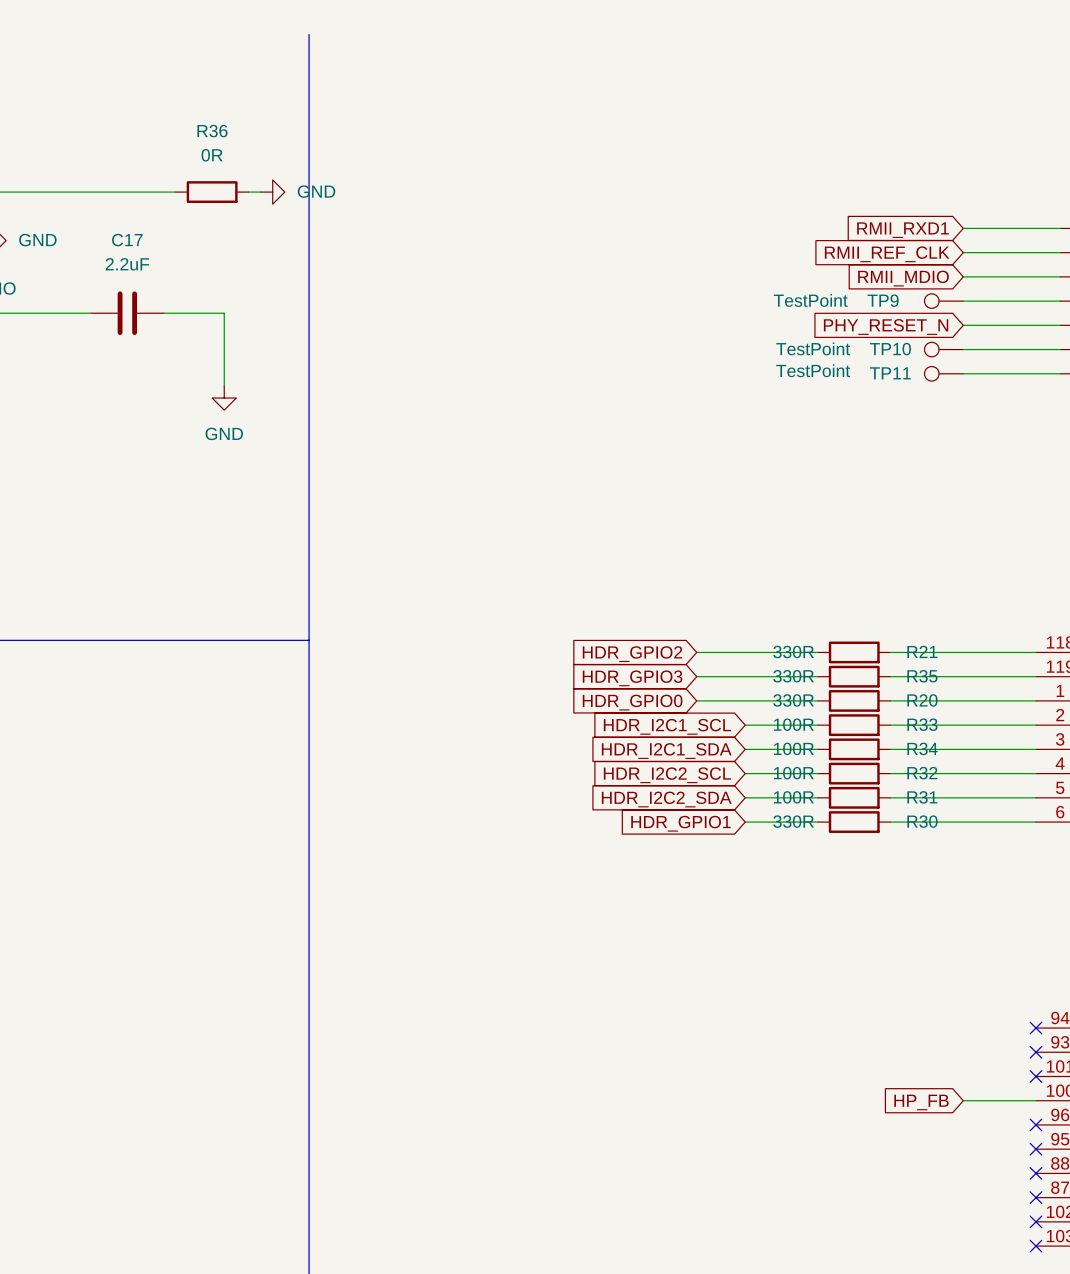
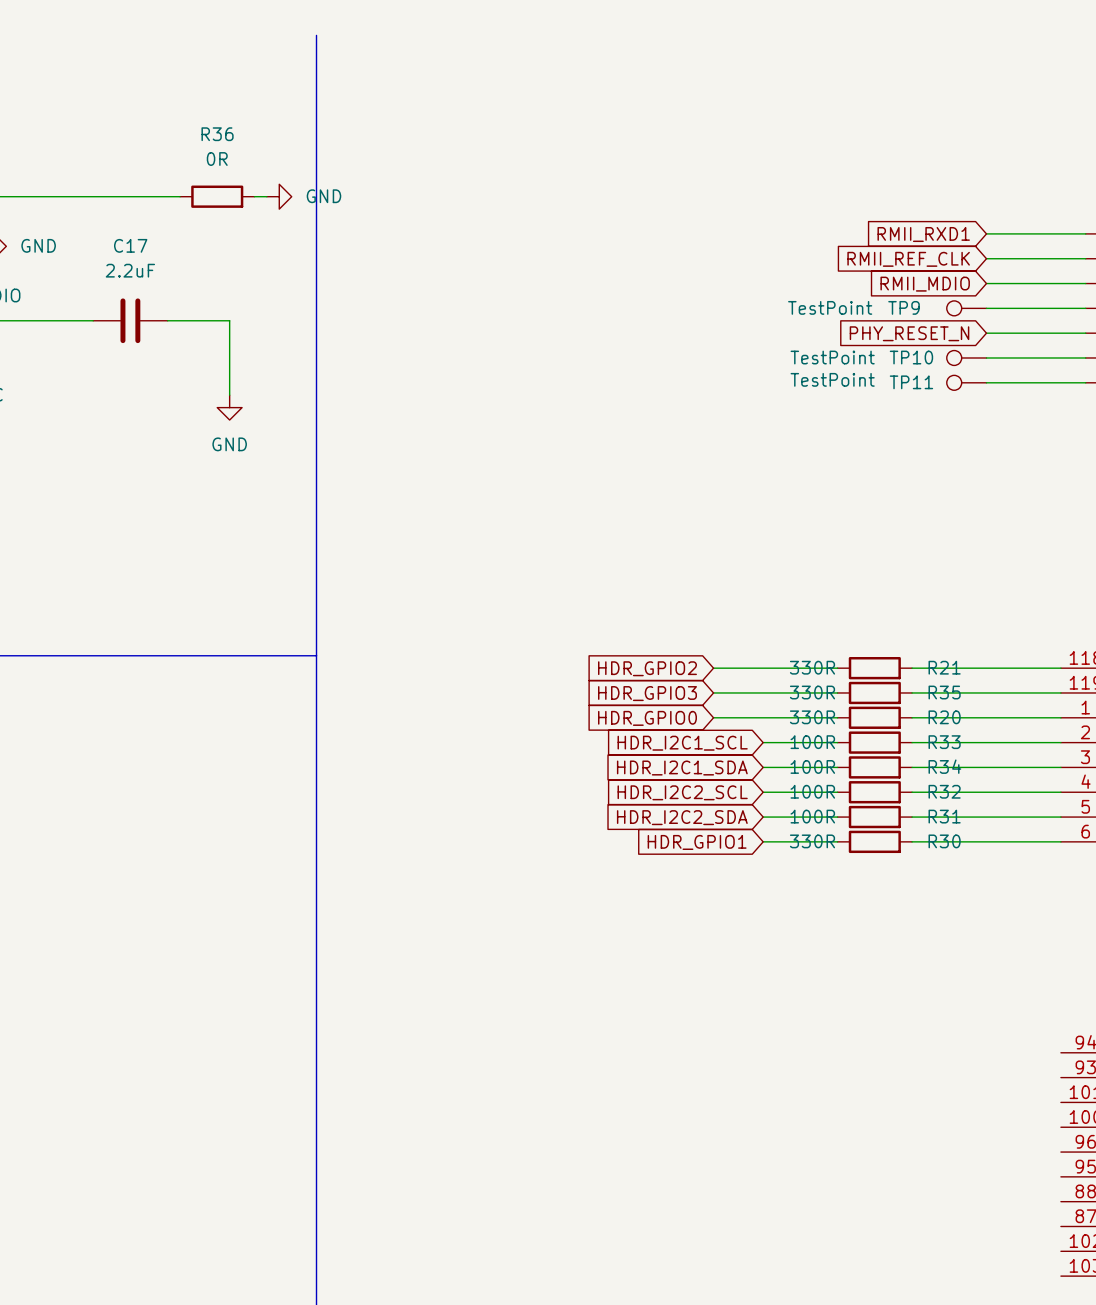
no-connect mark: (1035, 1028) -> none
no-connect mark: (1035, 1052) -> none
no-connect mark: (1035, 1076) -> none
wire: (963, 1100) (1035, 1100) -> none
global label: HP_FB (921, 1102) -> none
no-connect mark: (1035, 1124) -> none
no-connect mark: (1035, 1149) -> none
no-connect mark: (1035, 1173) -> none
no-connect mark: (1035, 1197) -> none
no-connect mark: (1035, 1221) -> none
no-connect mark: (1035, 1246) -> none

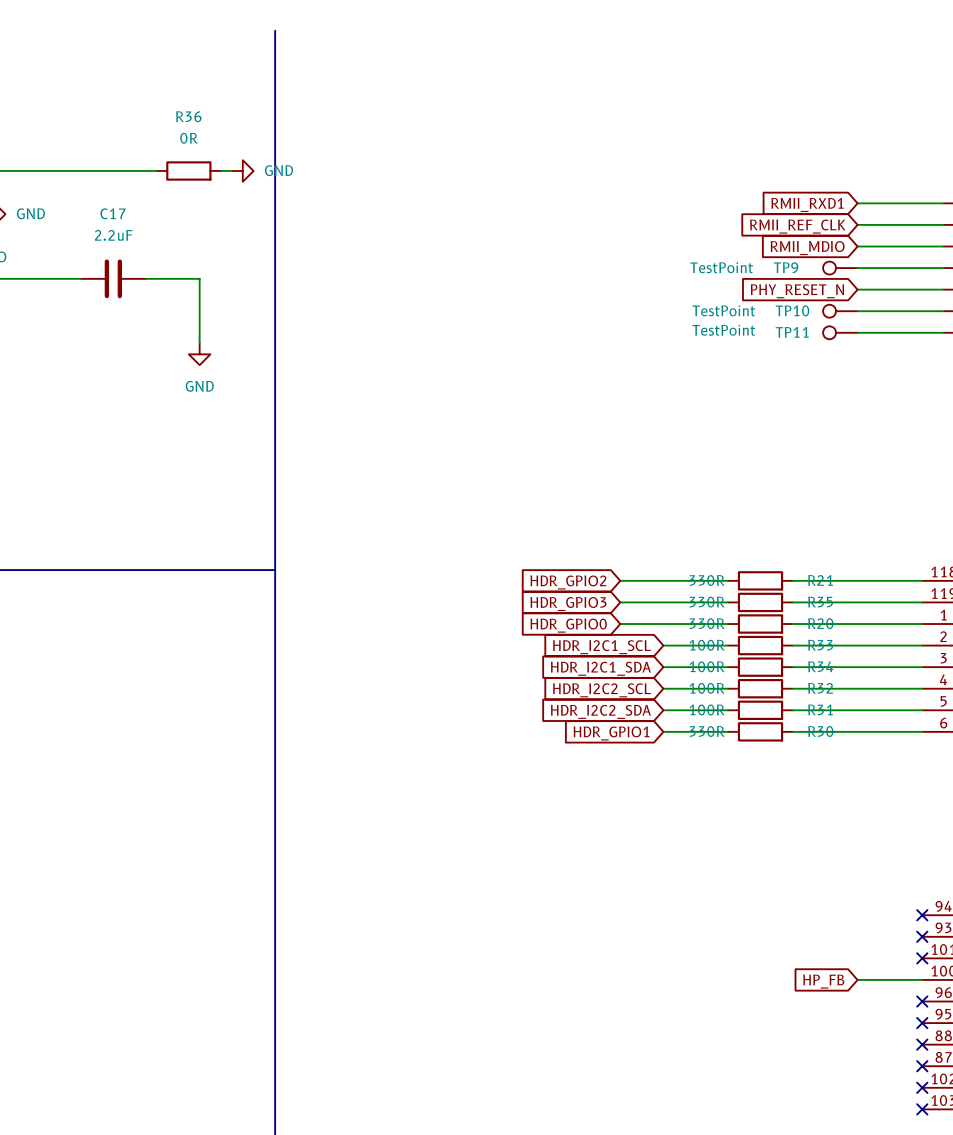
no-connect mark: none -> (922, 915)
no-connect mark: none -> (922, 936)
no-connect mark: none -> (922, 958)
global label: none -> HP_FB (823, 981)
wire: none -> (857, 979) (922, 979)
no-connect mark: none -> (922, 1001)
no-connect mark: none -> (922, 1023)
no-connect mark: none -> (922, 1044)
no-connect mark: none -> (922, 1066)
no-connect mark: none -> (922, 1087)
no-connect mark: none -> (922, 1109)

